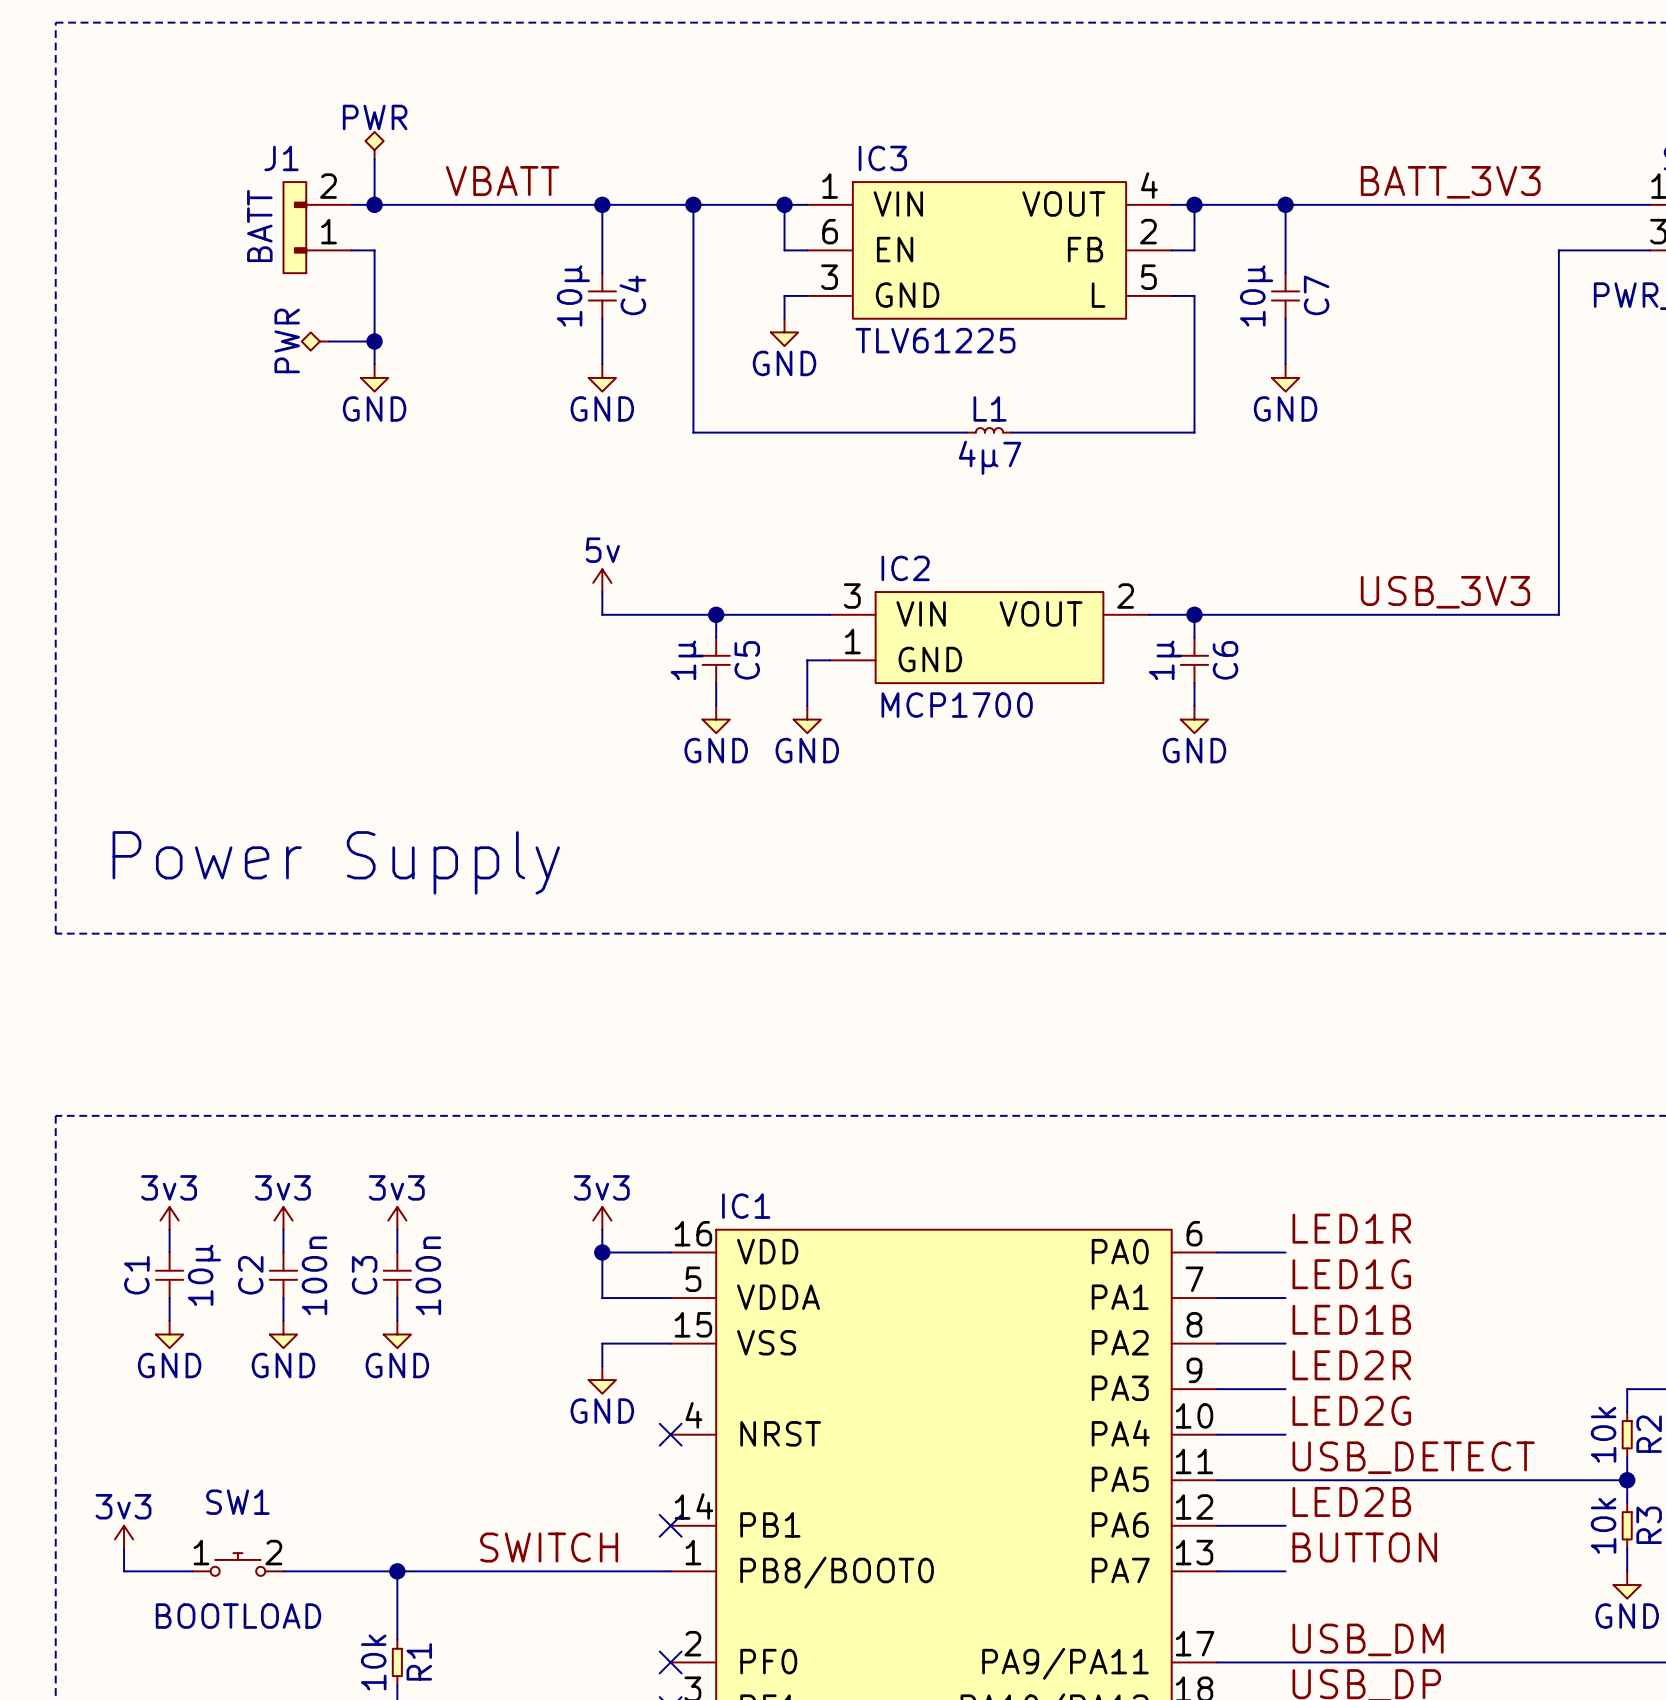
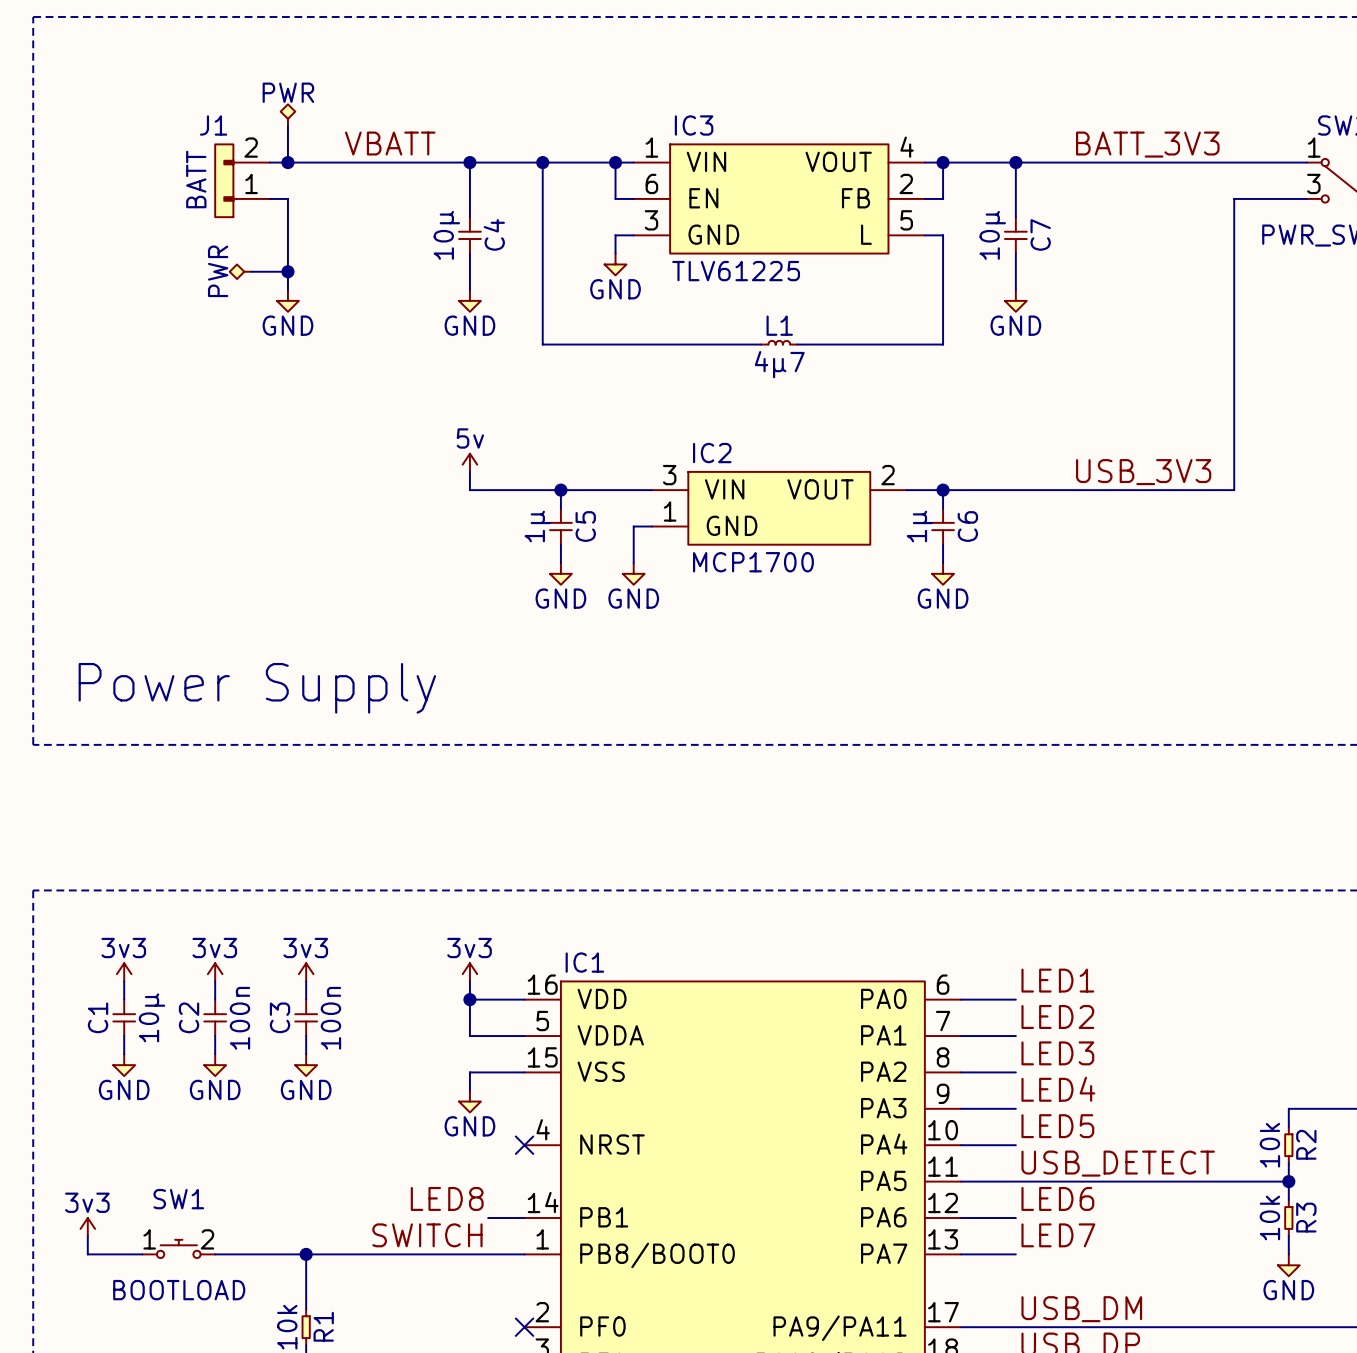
label: LED1R (1351, 1228) -> LED1 (1057, 980)
label: LED1G (1351, 1274) -> LED2 (1057, 1016)
label: LED1B (1351, 1319) -> LED3 (1057, 1053)
label: LED2R (1351, 1365) -> LED4 (1058, 1089)
label: LED2G (1351, 1410) -> LED5 (1057, 1126)
label: none -> LED8 (447, 1198)
label: LED2B (1351, 1501) -> LED6 (1057, 1198)
wire: none -> (488, 1218) (524, 1218)
no-connect mark: (670, 1525) -> none
label: BUTTON (1364, 1547) -> LED7 (1058, 1235)

